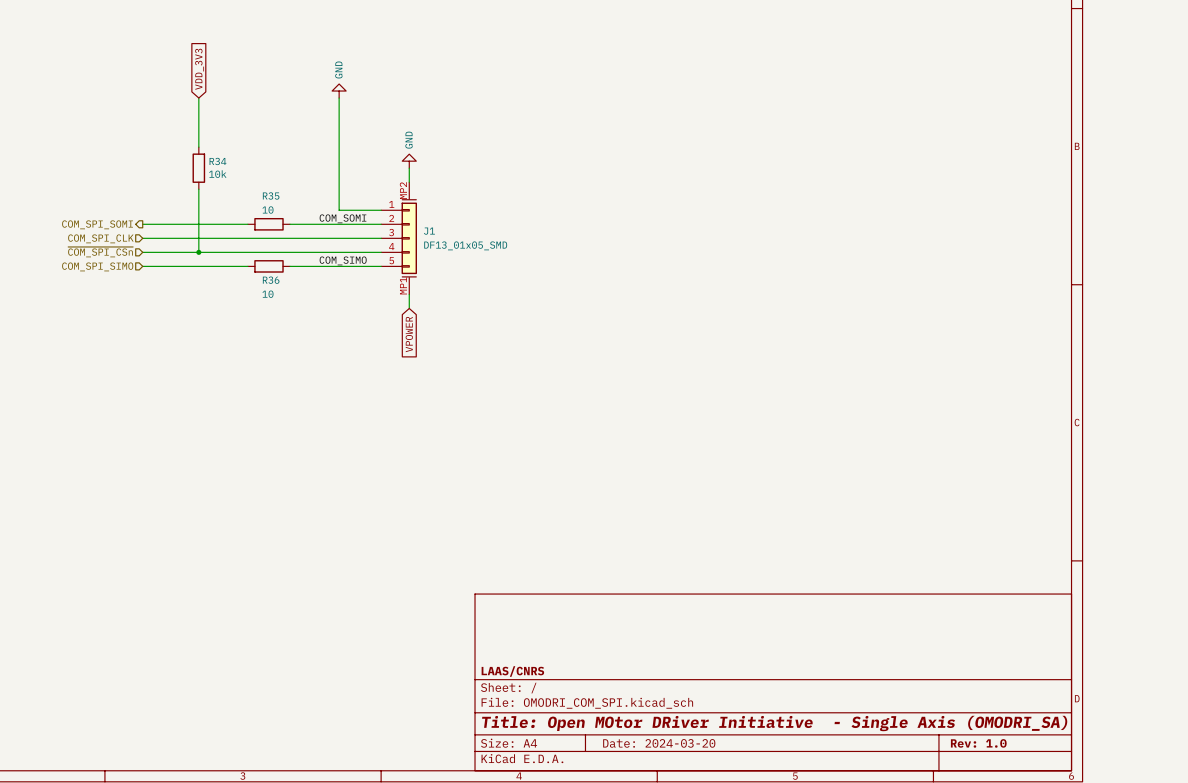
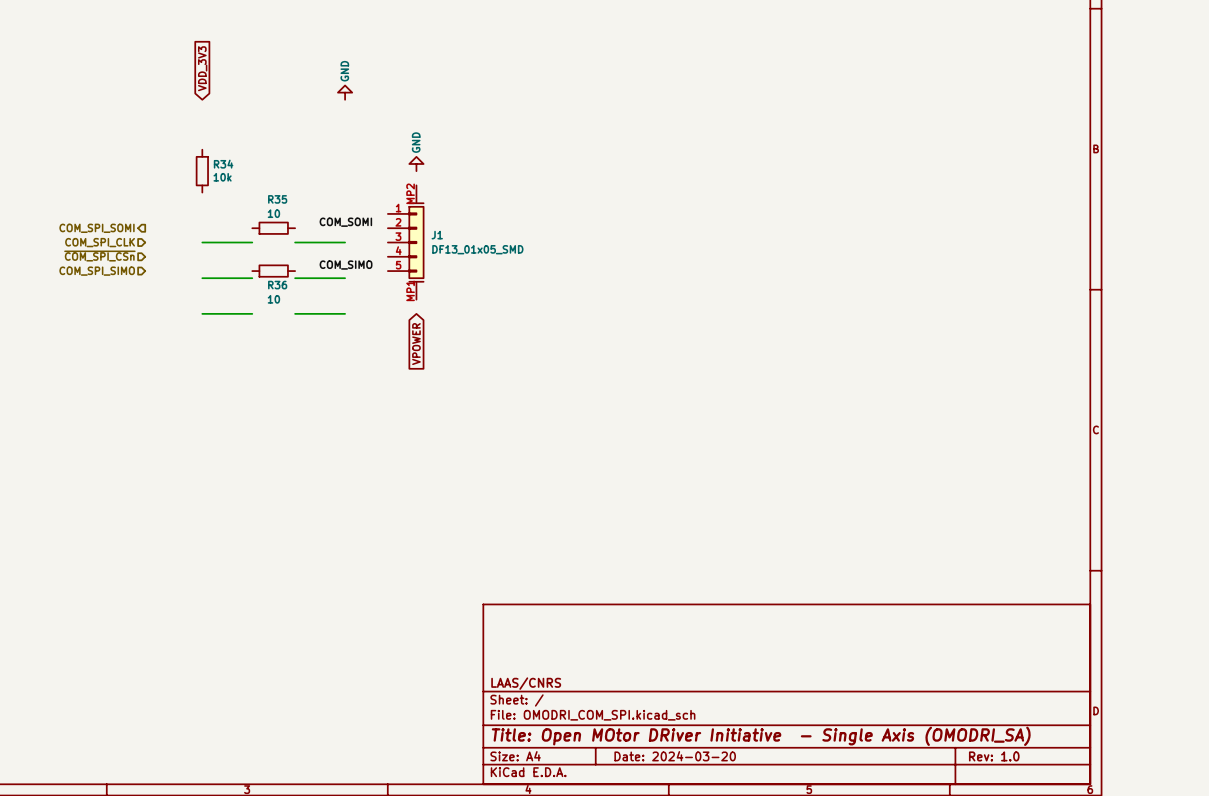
wire: (198, 98) (198, 147) -> none
wire: (339, 98) (339, 210) (381, 210) -> none
wire: (409, 168) (409, 182) -> none
wire: (198, 189) (198, 252) -> none
wire: (142, 224) (247, 224) -> none
wire: (290, 224) (381, 224) -> none
wire: (142, 238) (198, 238) -> none
wire: (247, 238) (290, 238) -> none
wire: (339, 238) (381, 238) -> none
wire: (142, 252) (381, 252) -> none
junction: (198, 252) -> none
wire: (142, 266) (247, 266) -> none
wire: (290, 266) (381, 266) -> none
wire: none -> (202, 278) (252, 278)
wire: none -> (295, 278) (345, 278)
wire: (409, 294) (409, 308) -> none
wire: none -> (202, 313) (252, 313)
wire: none -> (295, 313) (345, 313)

